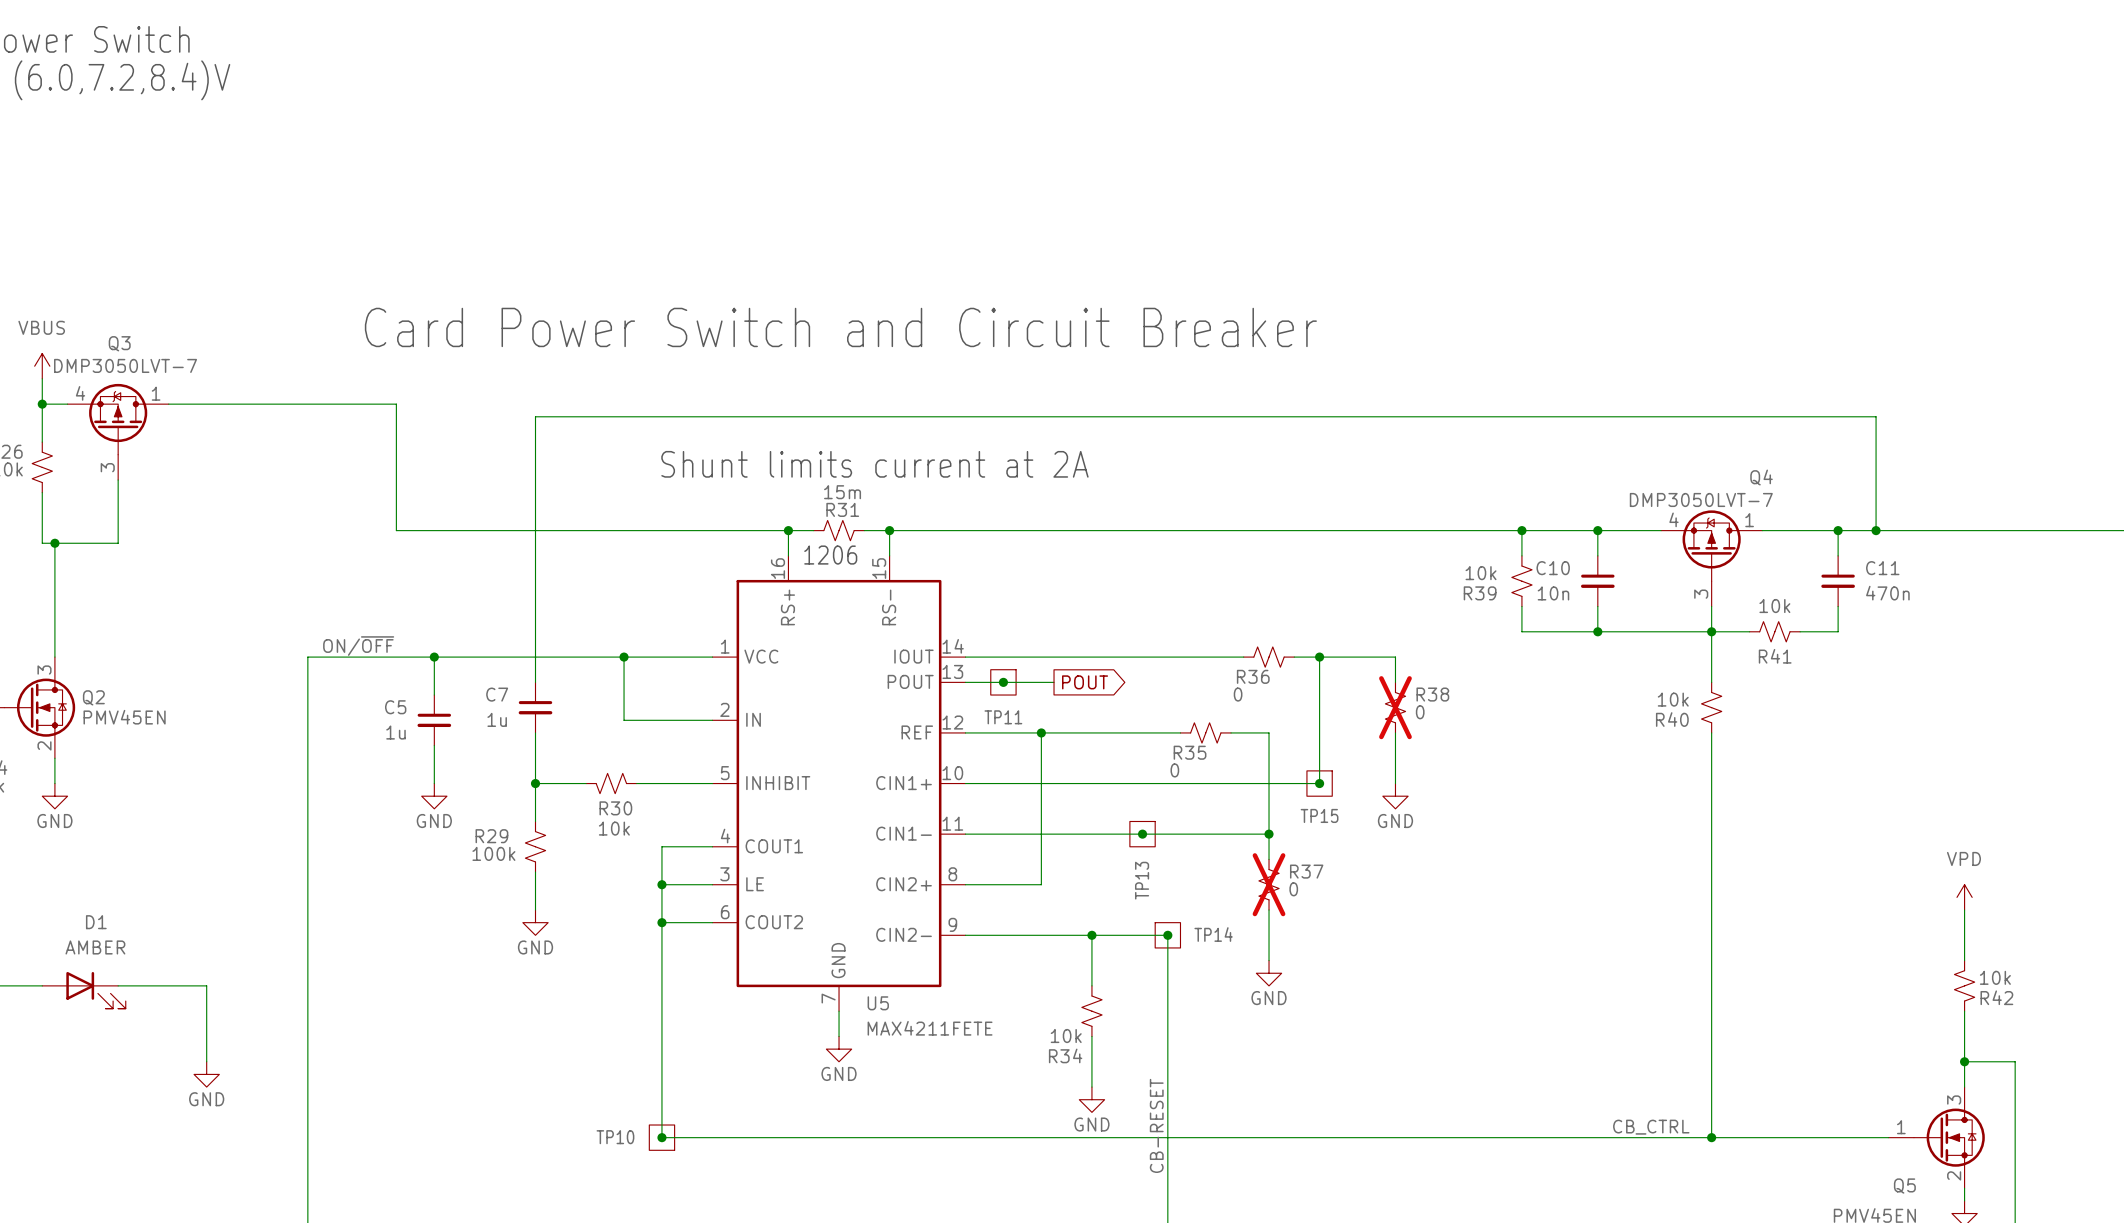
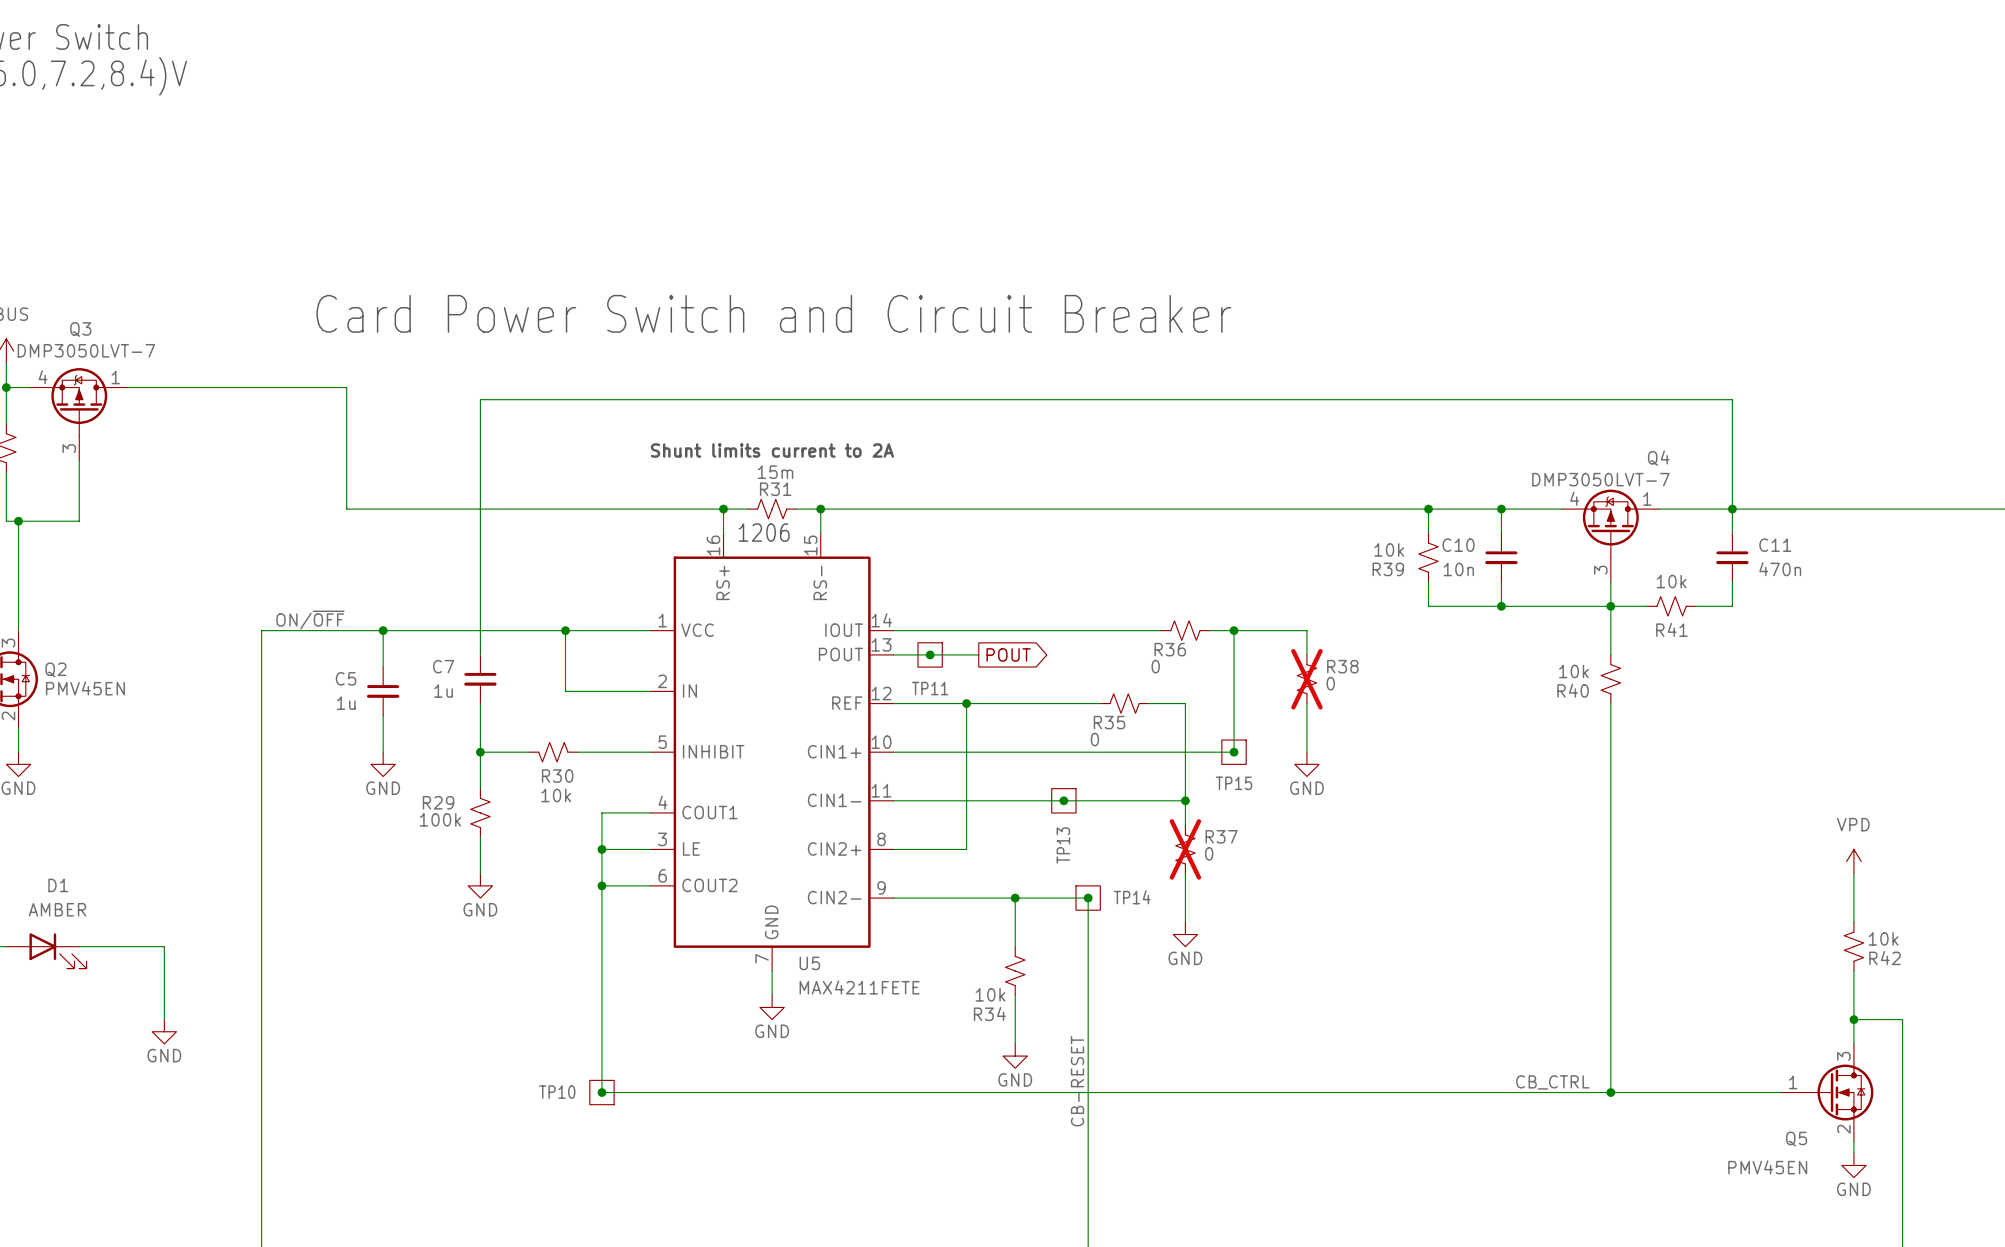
wire: (1838, 416) (1876, 416) (1876, 530) -> (1732, 399) (1732, 509)
text: Shunt limits current at 2A (874, 464) -> Shunt limits current to 2A (772, 450)
junction: (1876, 530) -> none

